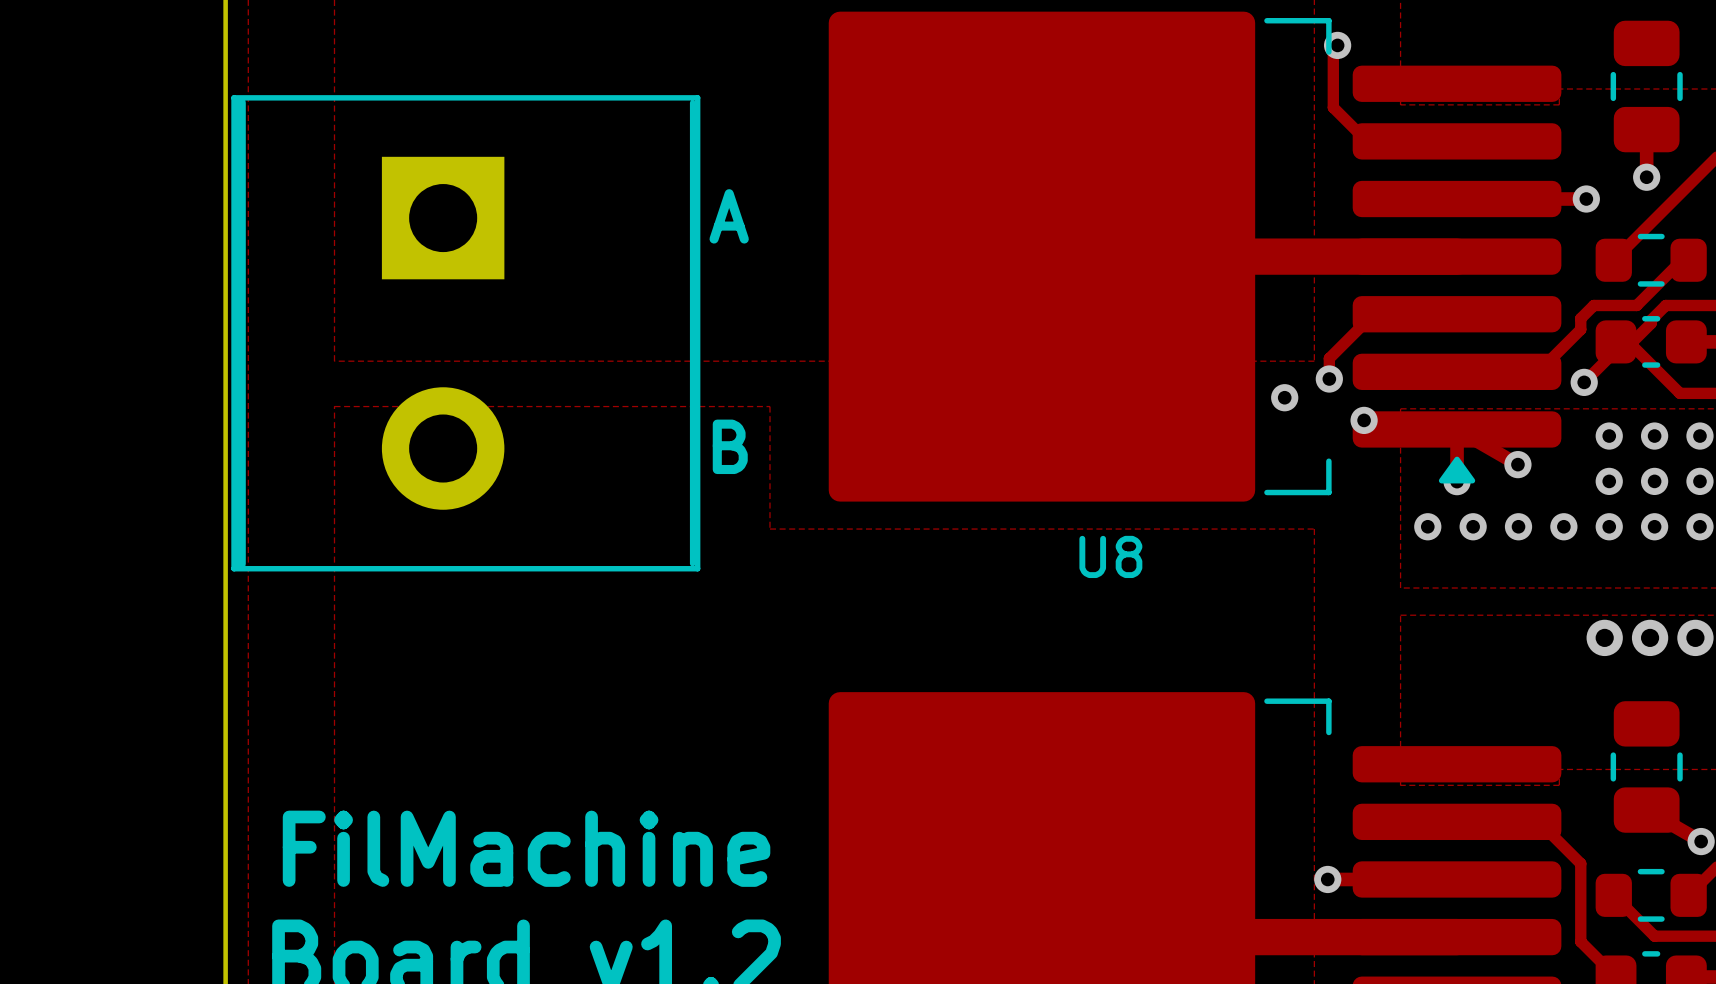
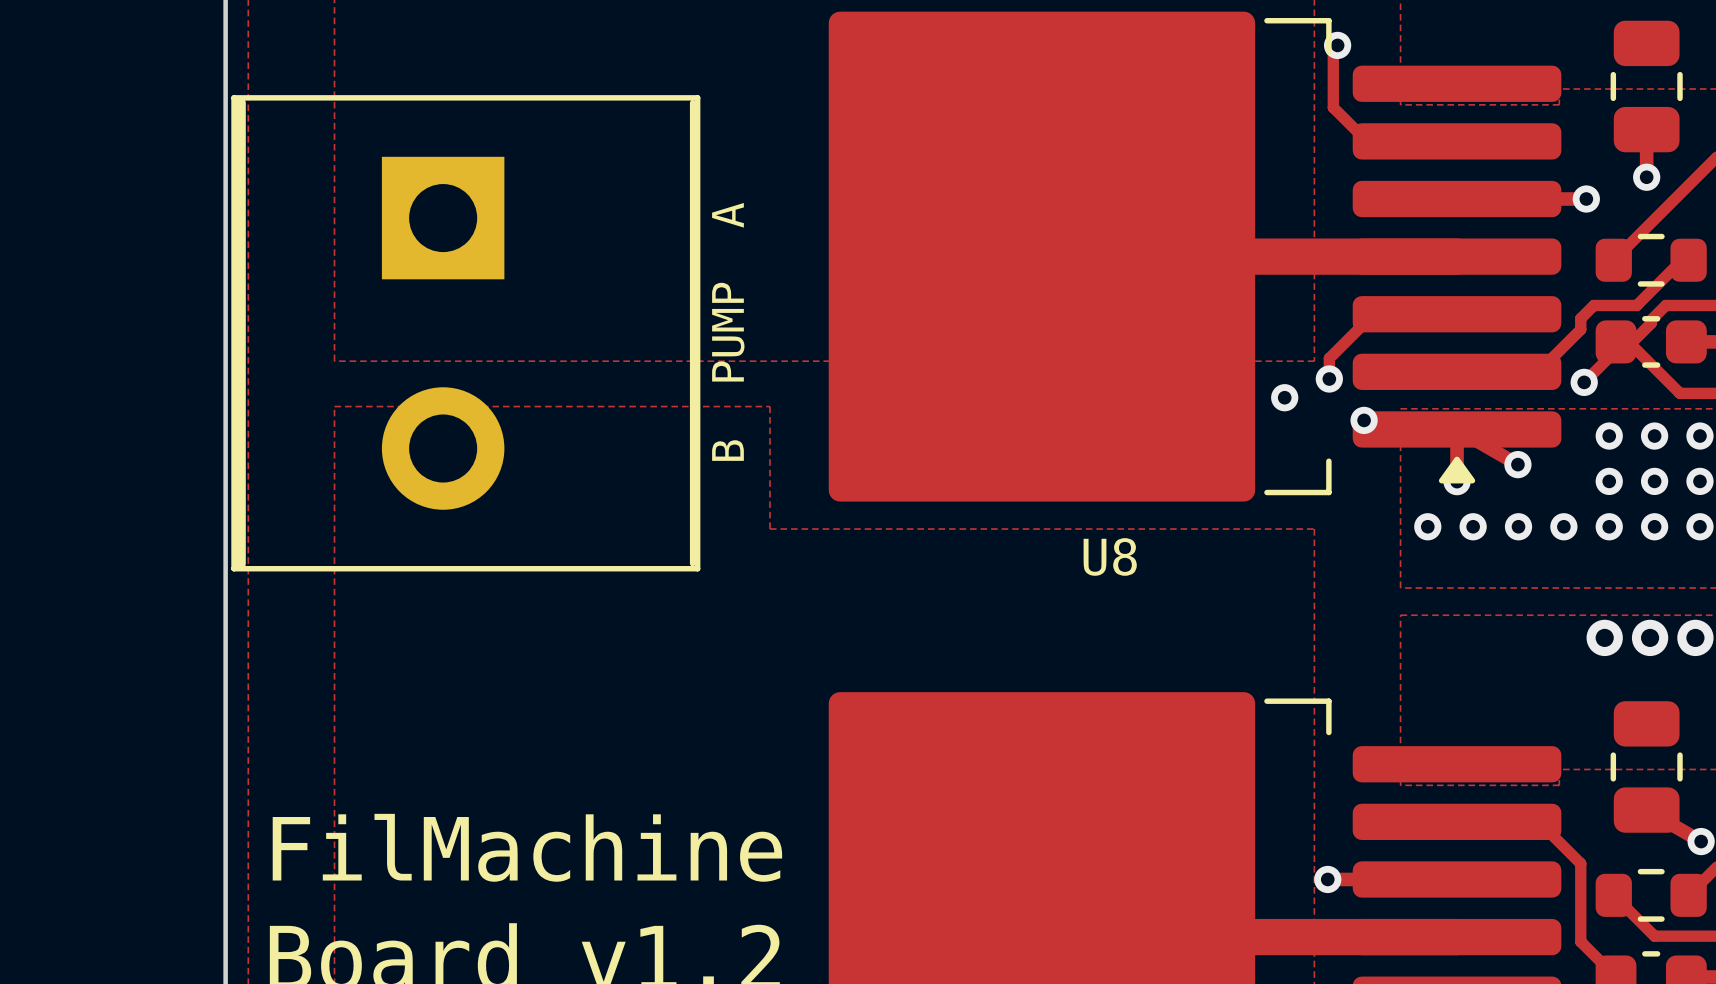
text: A (729, 216) -> none
text: none -> B PUMP A (728, 331)
text: B (730, 446) -> none

